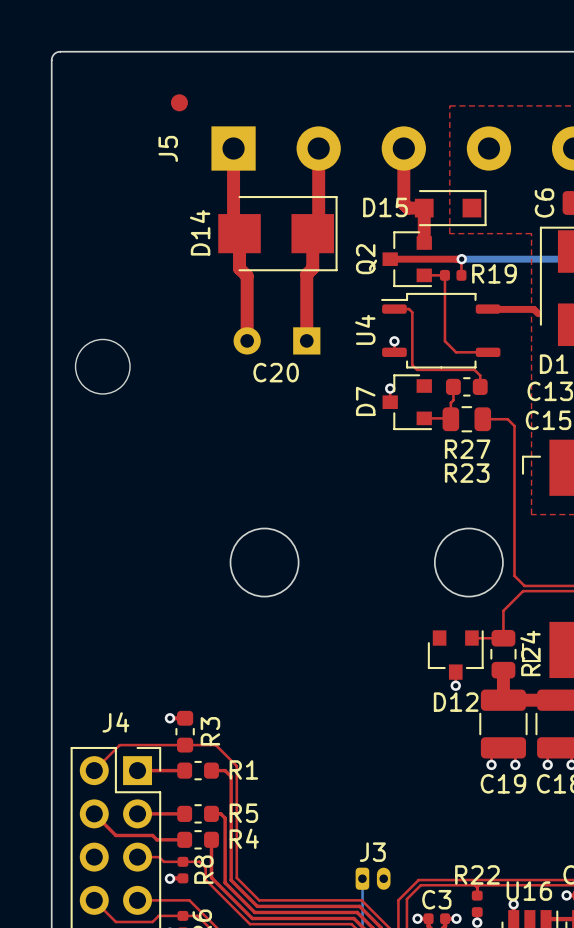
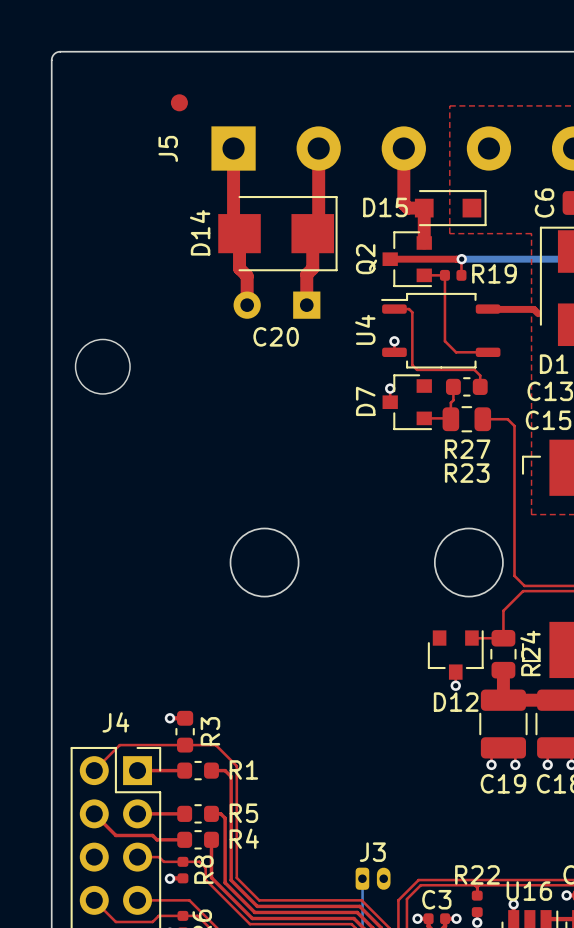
top track: (247, 305) (247, 340) -> none
top track: (306, 305) (306, 340) -> none
C20 position: (276, 340) -> (276, 305)

